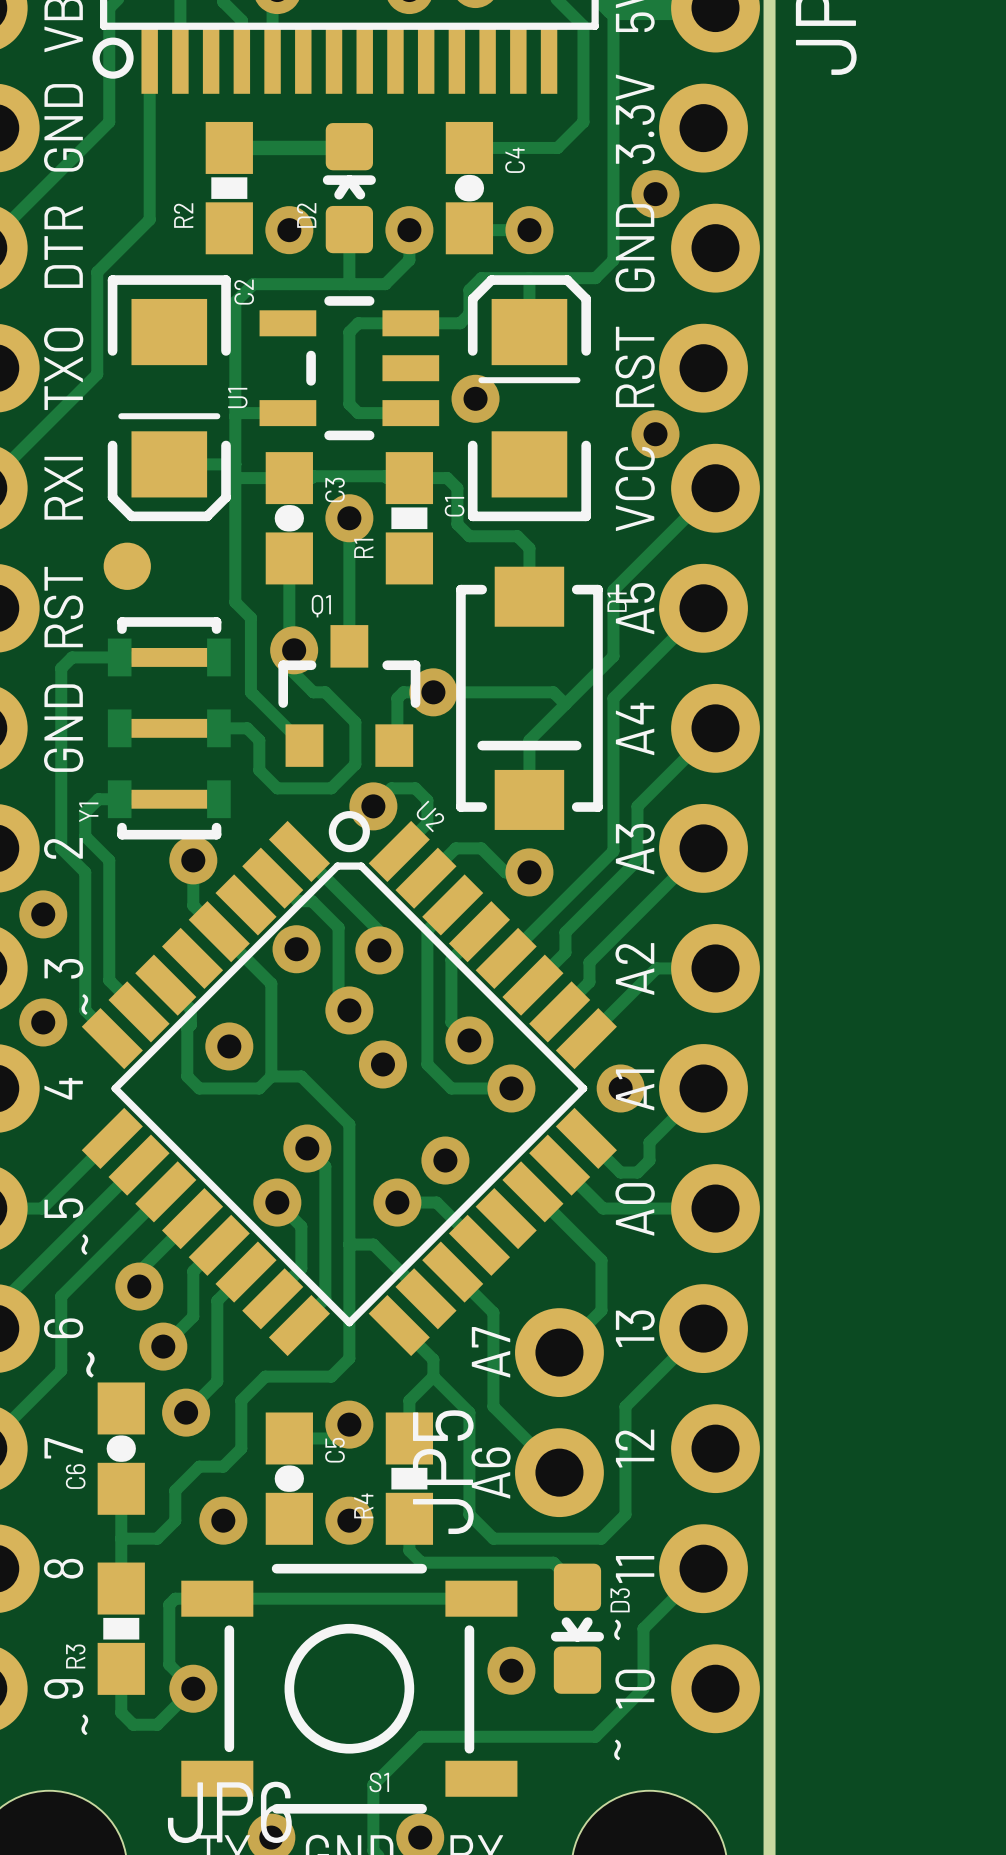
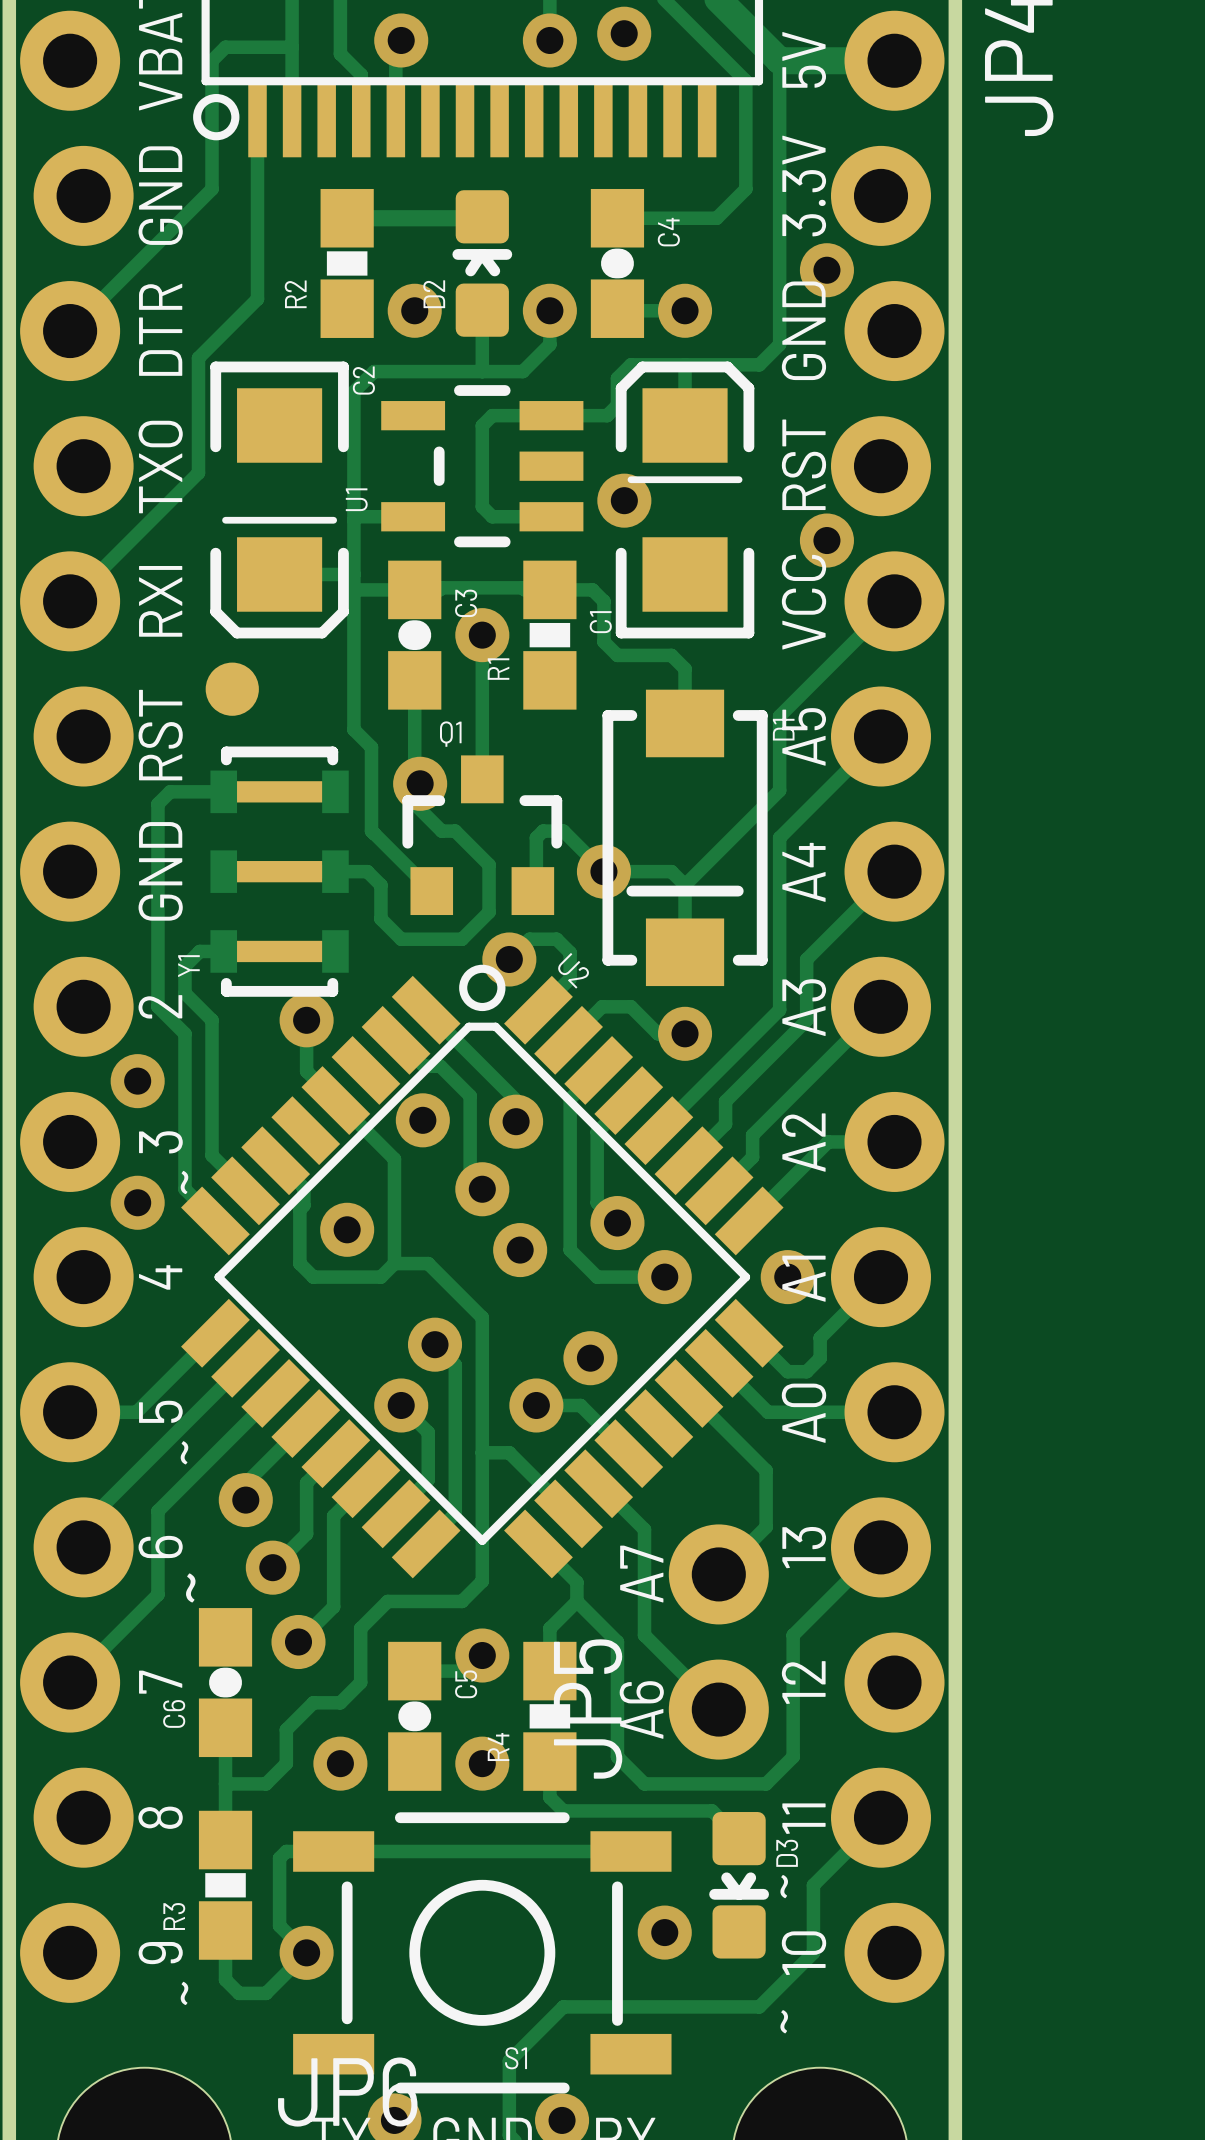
track: (421, 692) (553, 692) (565, 704) -> (563, 831) (603, 871) (671, 871) (685, 885)
via position: (433, 692) -> (603, 871)

